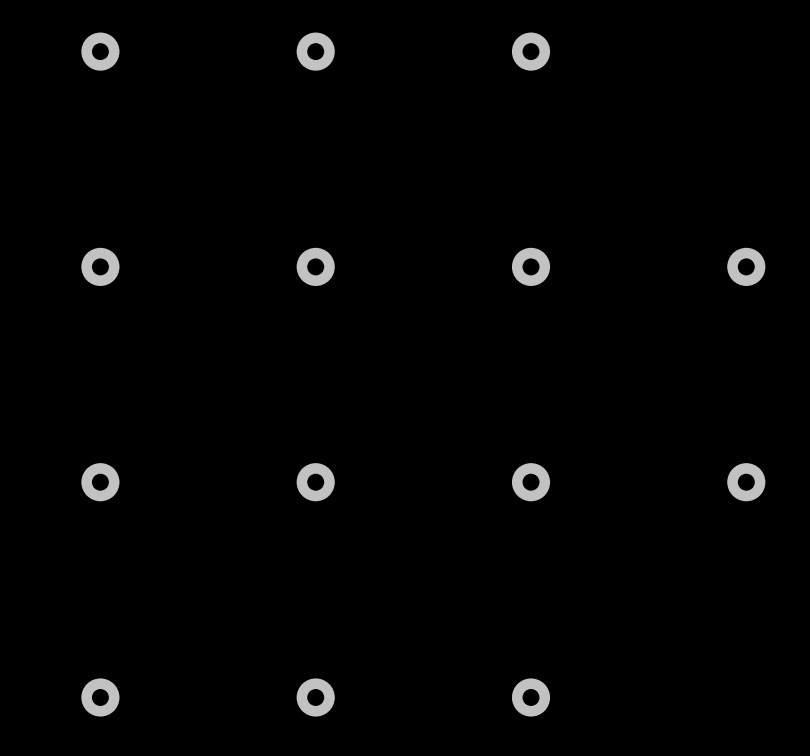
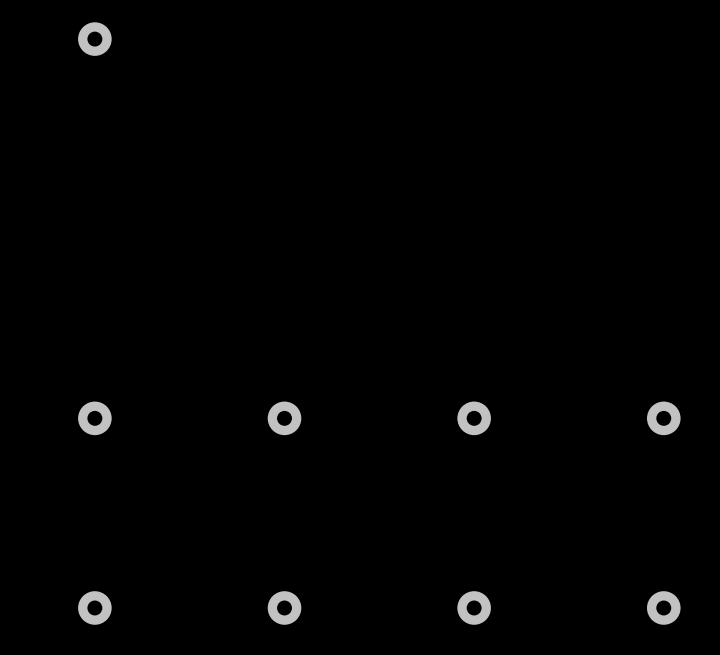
via: (315, 51) -> none
via: (531, 51) -> none
via: (100, 266) -> none
via: (315, 266) -> none
via: (531, 266) -> none
via: (746, 266) -> none
via: none -> (663, 607)

